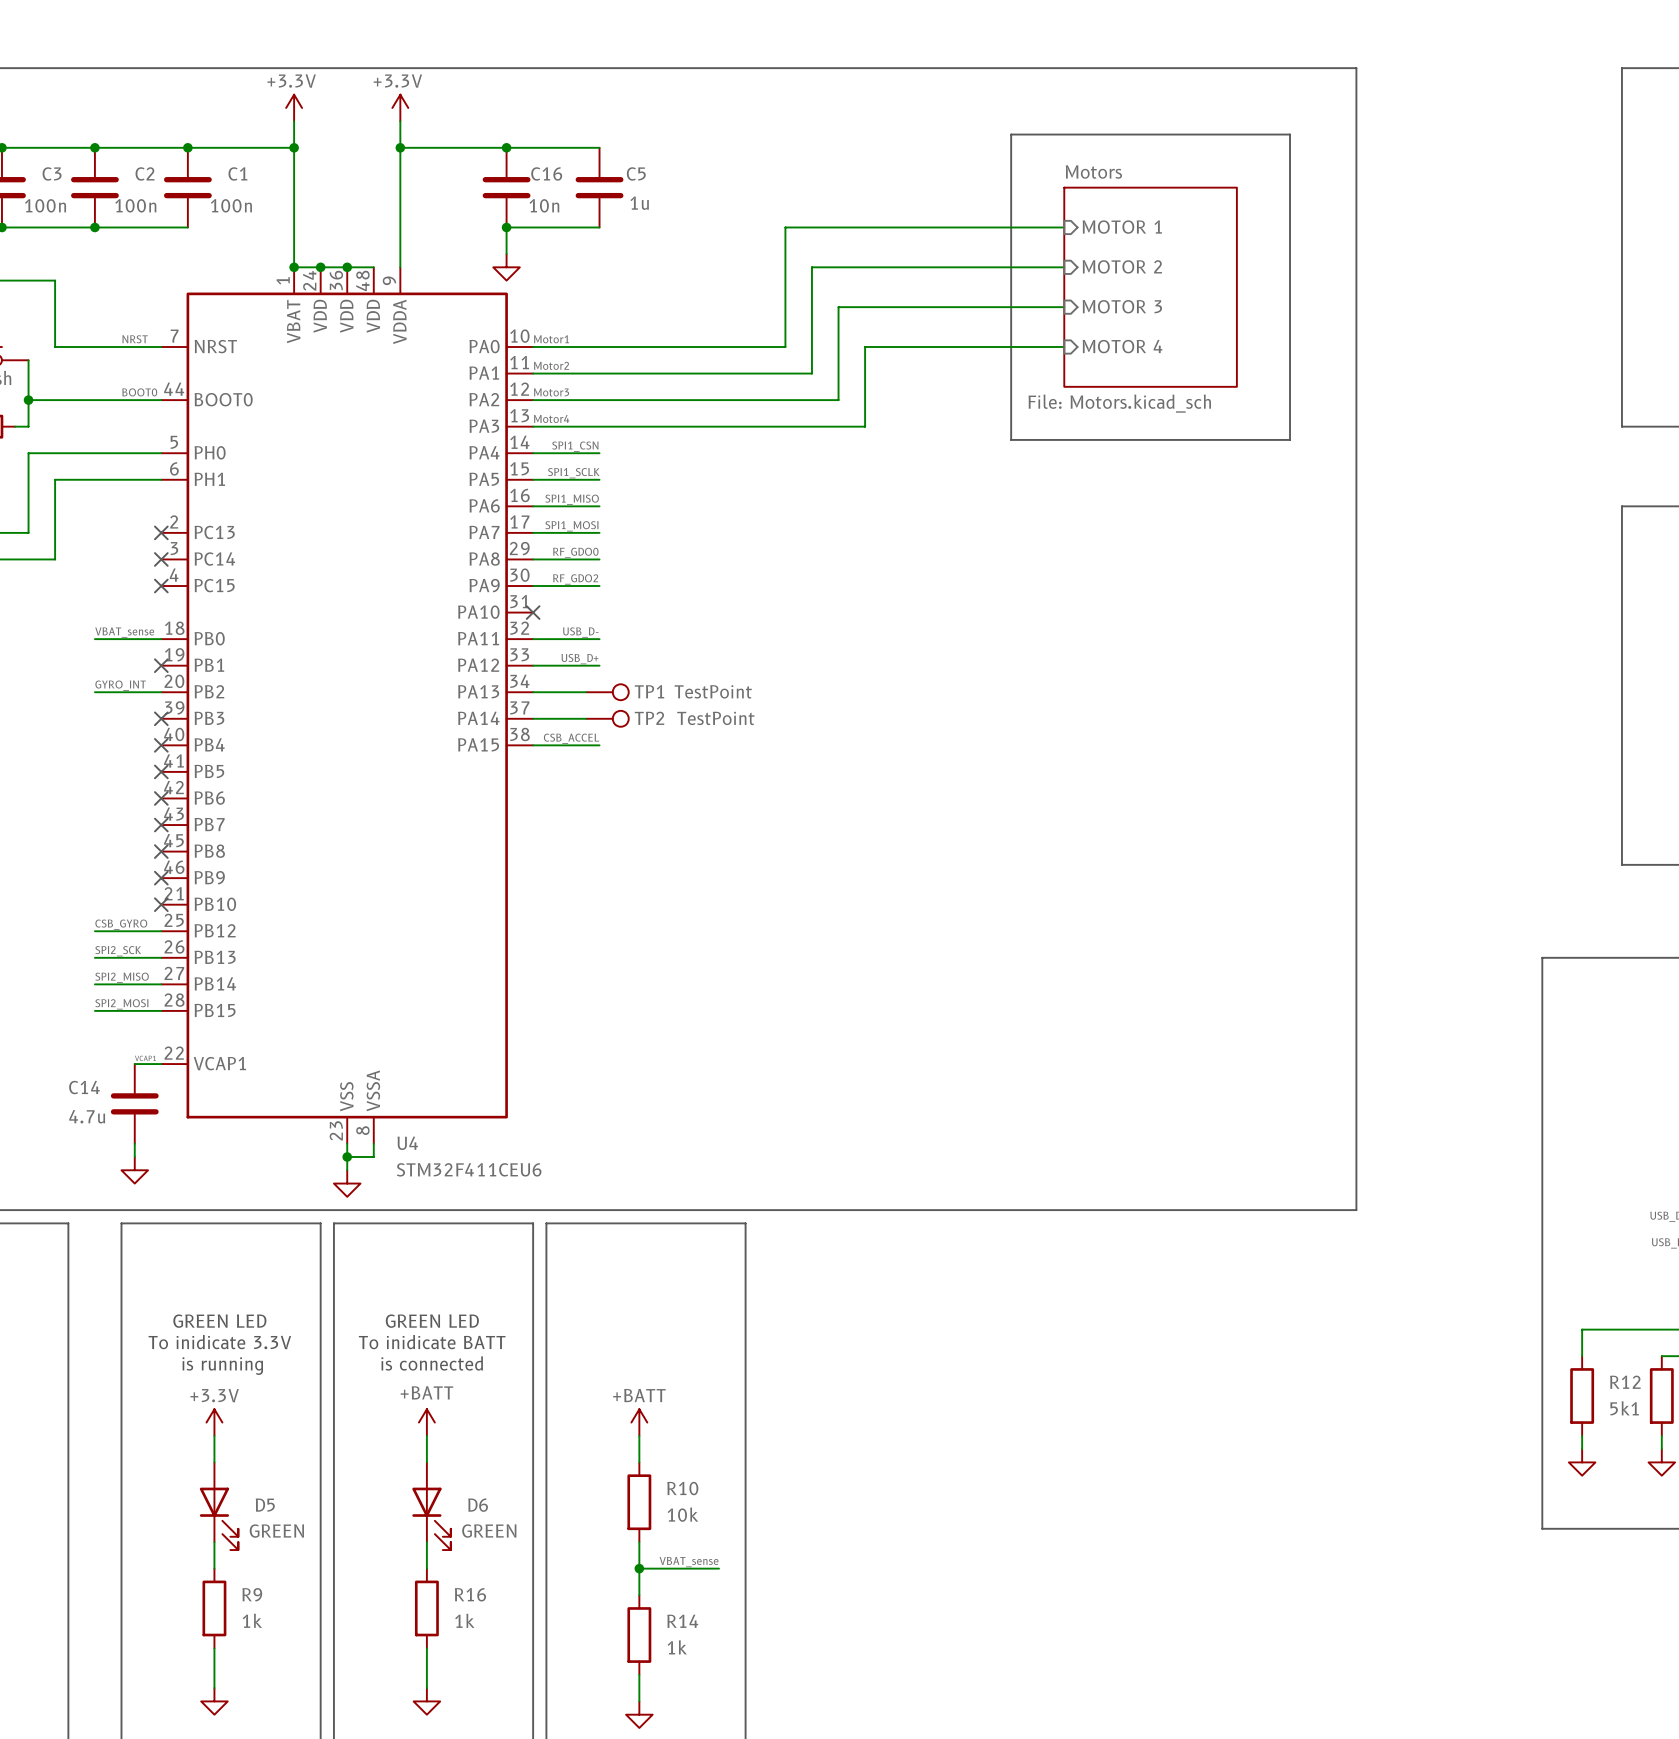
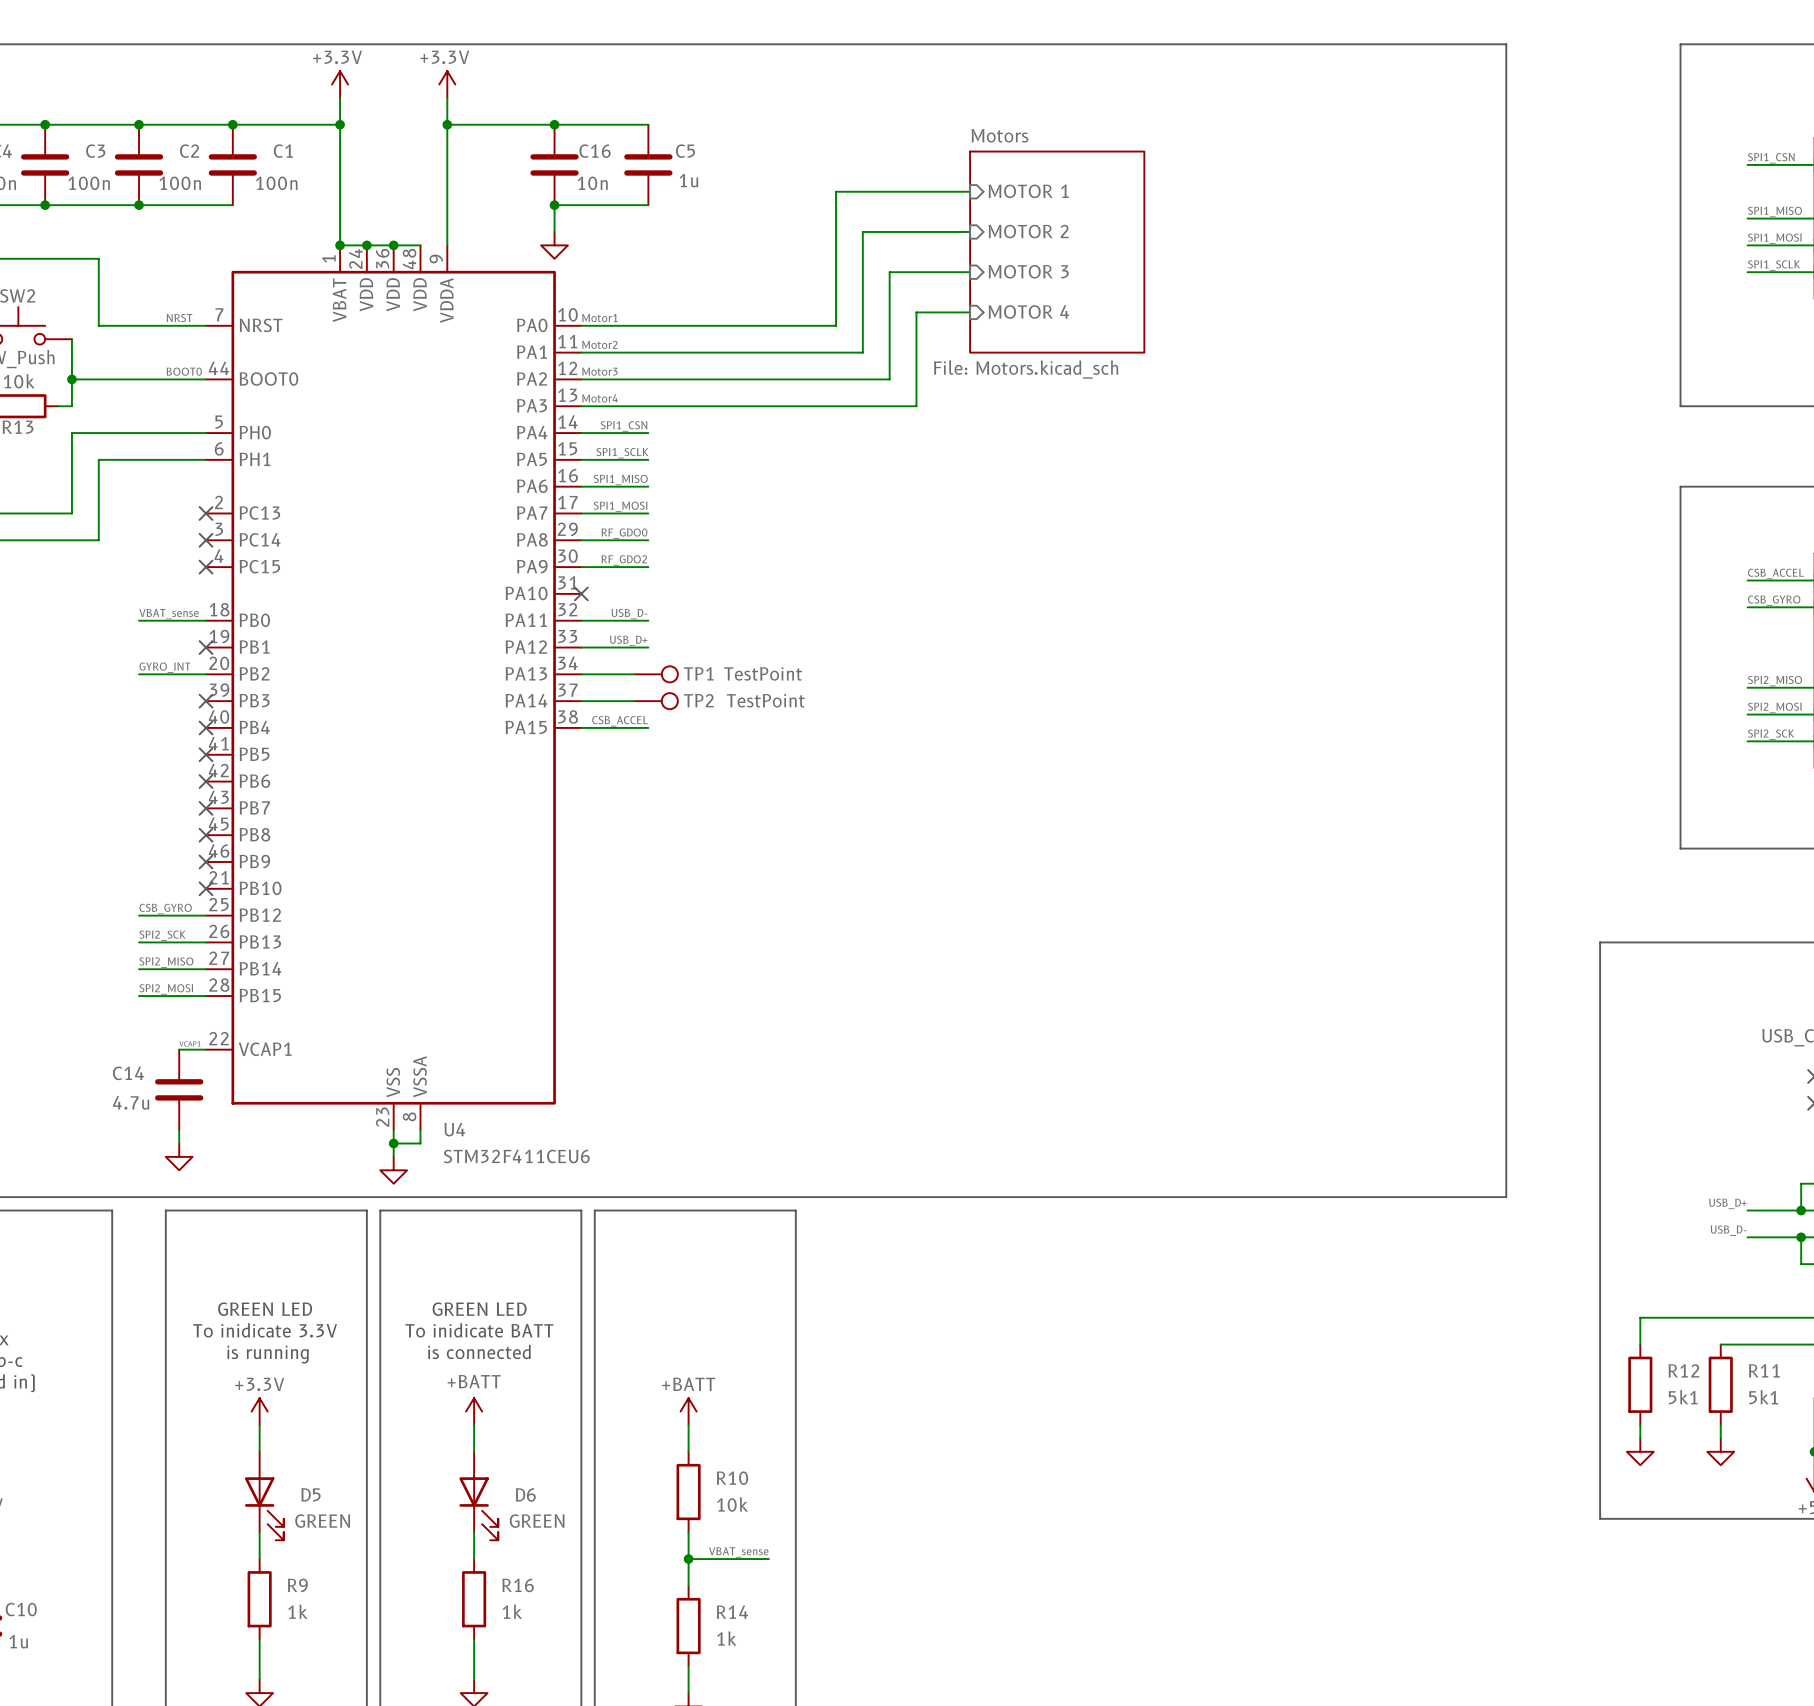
line: (1356, 68) (1356, 1210) -> (1412, 44) (1506, 44) (1506, 1197) (1412, 1197)
line: (1011, 134) (1290, 134) (1290, 439) (1011, 439) (1011, 134) -> none
wire: (785, 227) (1064, 227) -> (836, 205) (836, 191) (970, 191)
sheet pin position: MOTOR 1 (1122, 227) -> MOTOR 1 (1028, 191)
sheet pin position: MOTOR 2 (1122, 266) -> MOTOR 2 (1028, 231)
wire: (811, 267) (1064, 267) -> (862, 245) (862, 231) (970, 231)
sheet Motors position: (1150, 287) -> (1057, 252)
sheet pin position: MOTOR 3 (1122, 306) -> MOTOR 3 (1028, 271)
wire: (838, 307) (1064, 307) -> (889, 285) (889, 272) (970, 272)
wire: (865, 346) (1064, 346) -> (916, 325) (916, 312) (970, 312)
sheet pin position: MOTOR 4 (1122, 346) -> MOTOR 4 (1028, 311)

